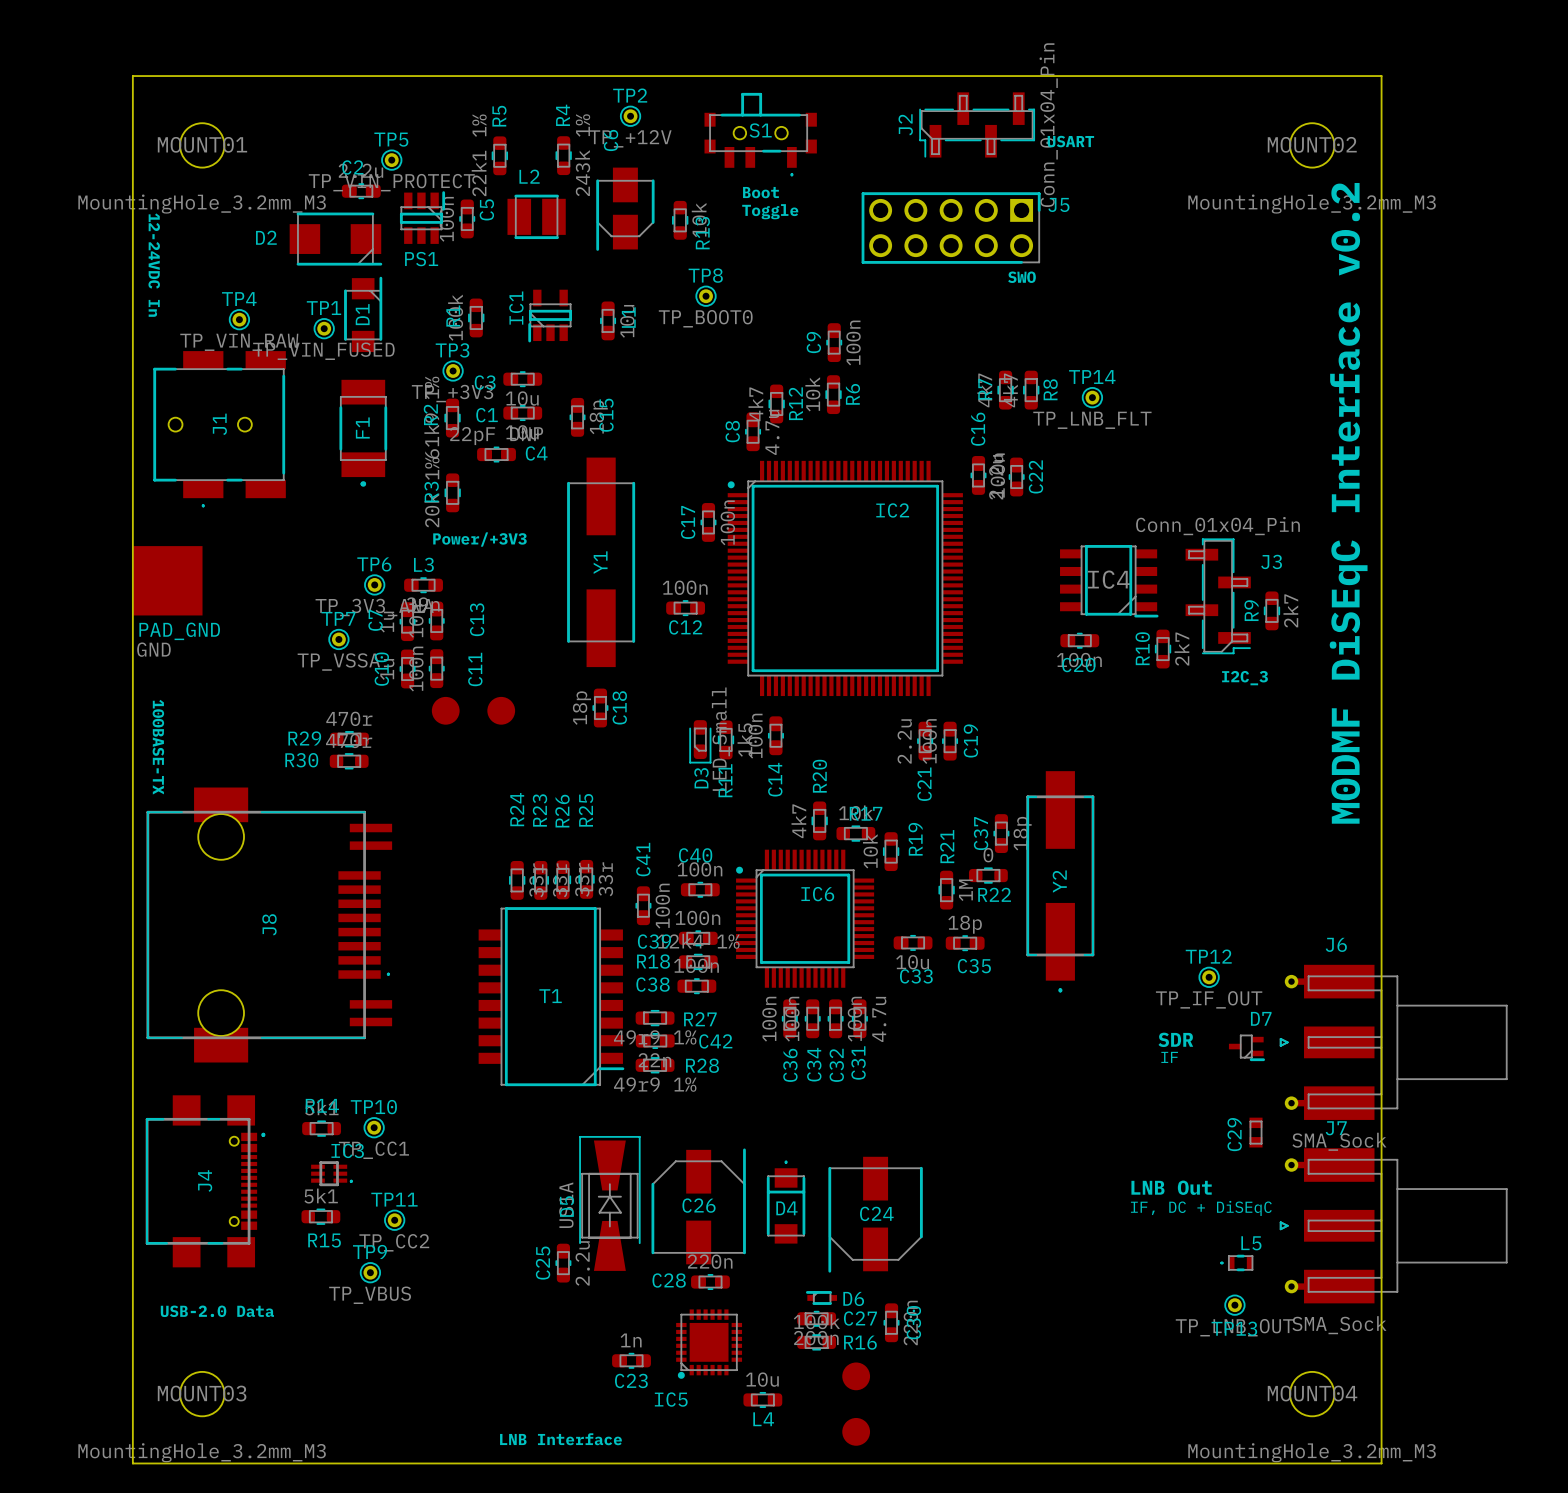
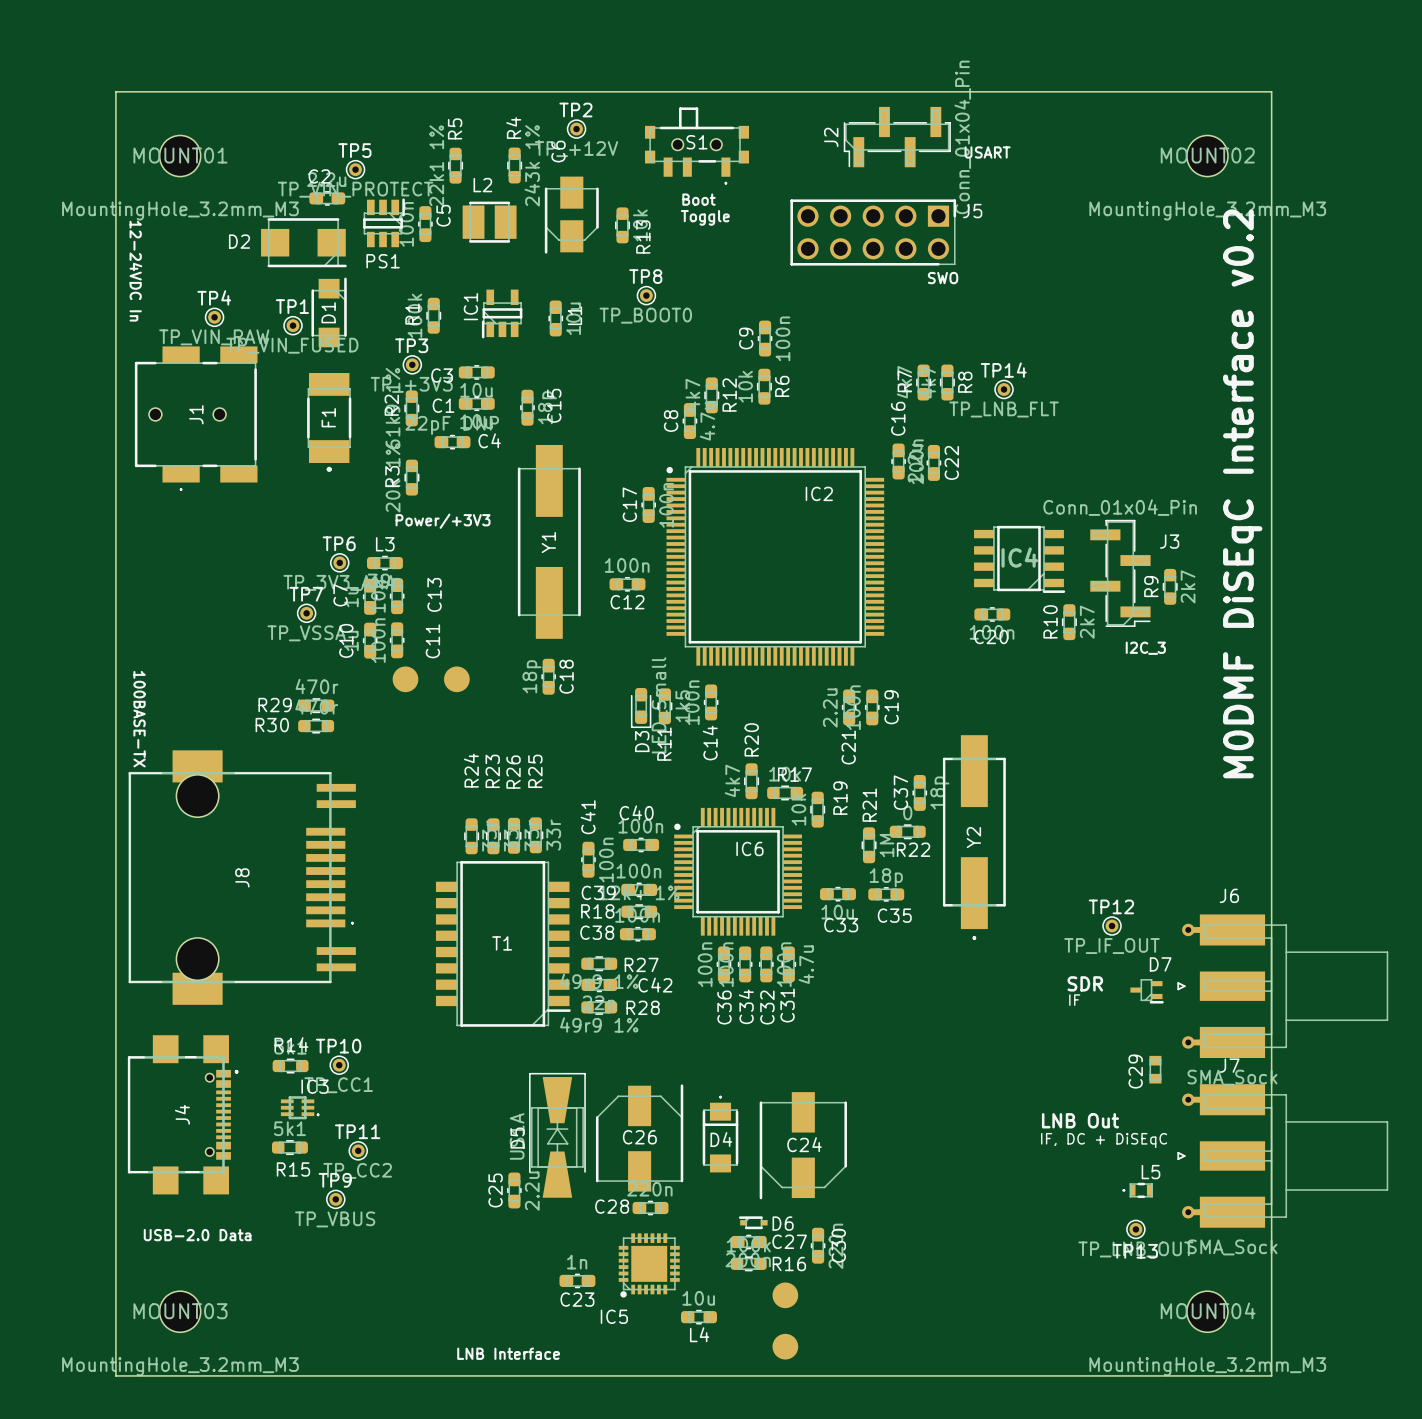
PAD_GND: GND (167, 580) -> none

